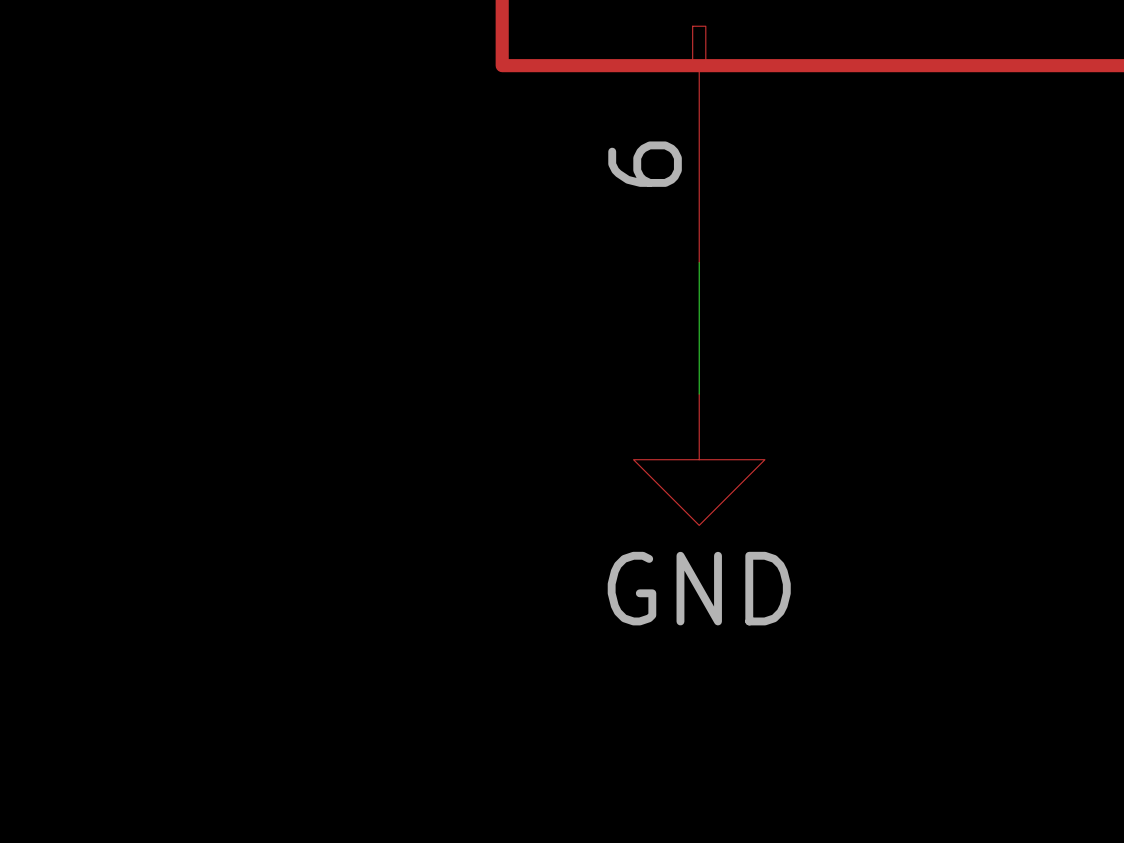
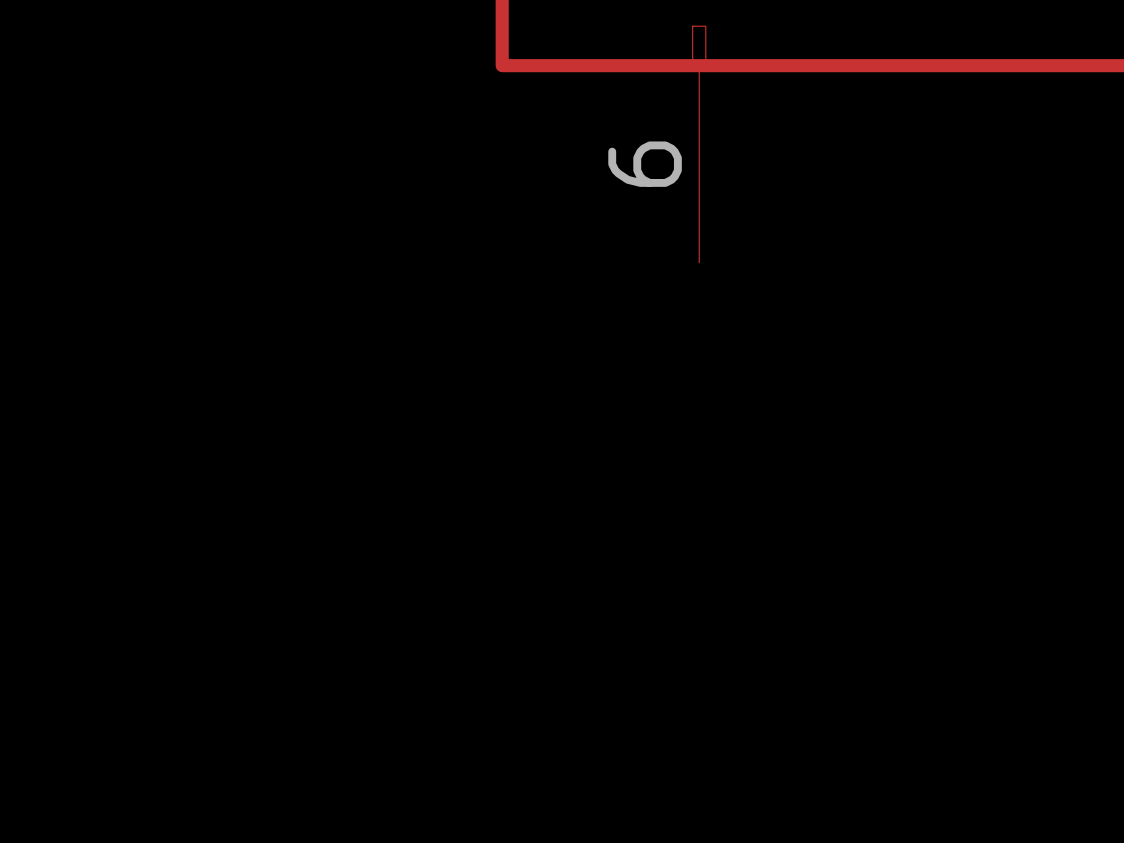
wire: (699, 262) (699, 394) -> none
power symbol: GND (699, 459) -> none

